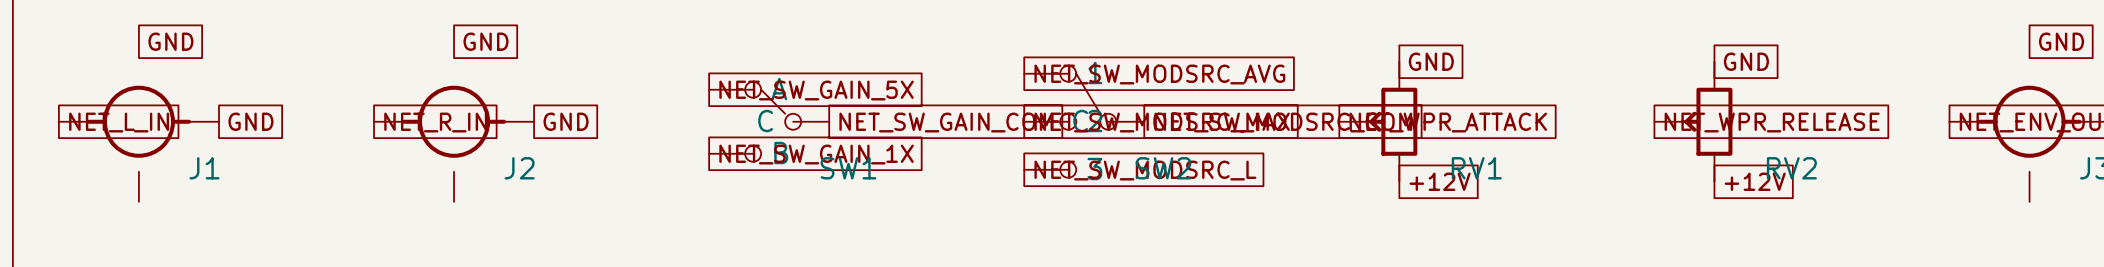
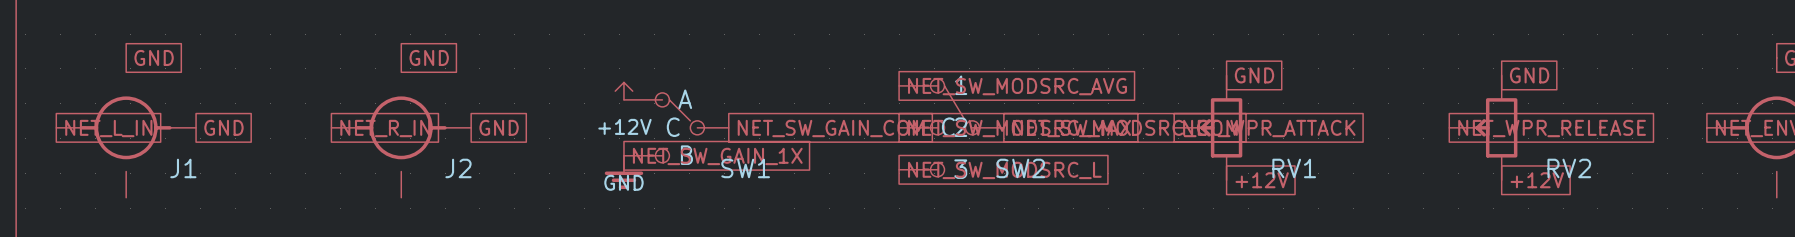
power symbol: none -> +12V (623, 91)
global label: NET_SW_GAIN_5X (816, 90) -> none
power symbol: none -> GND (623, 172)

